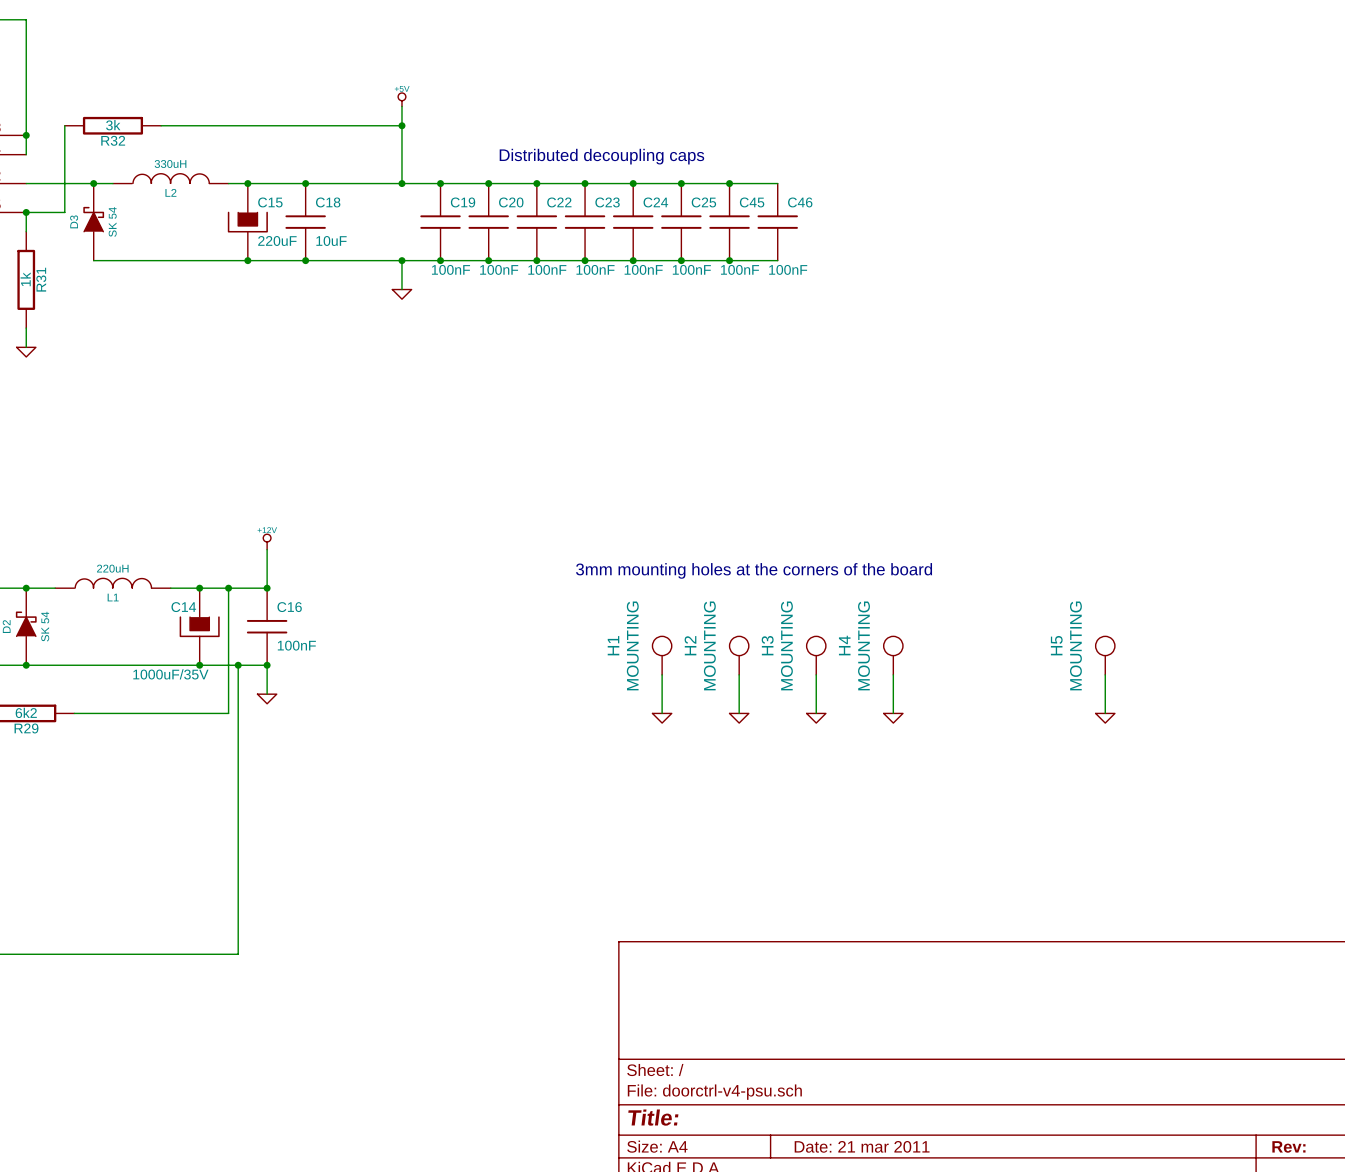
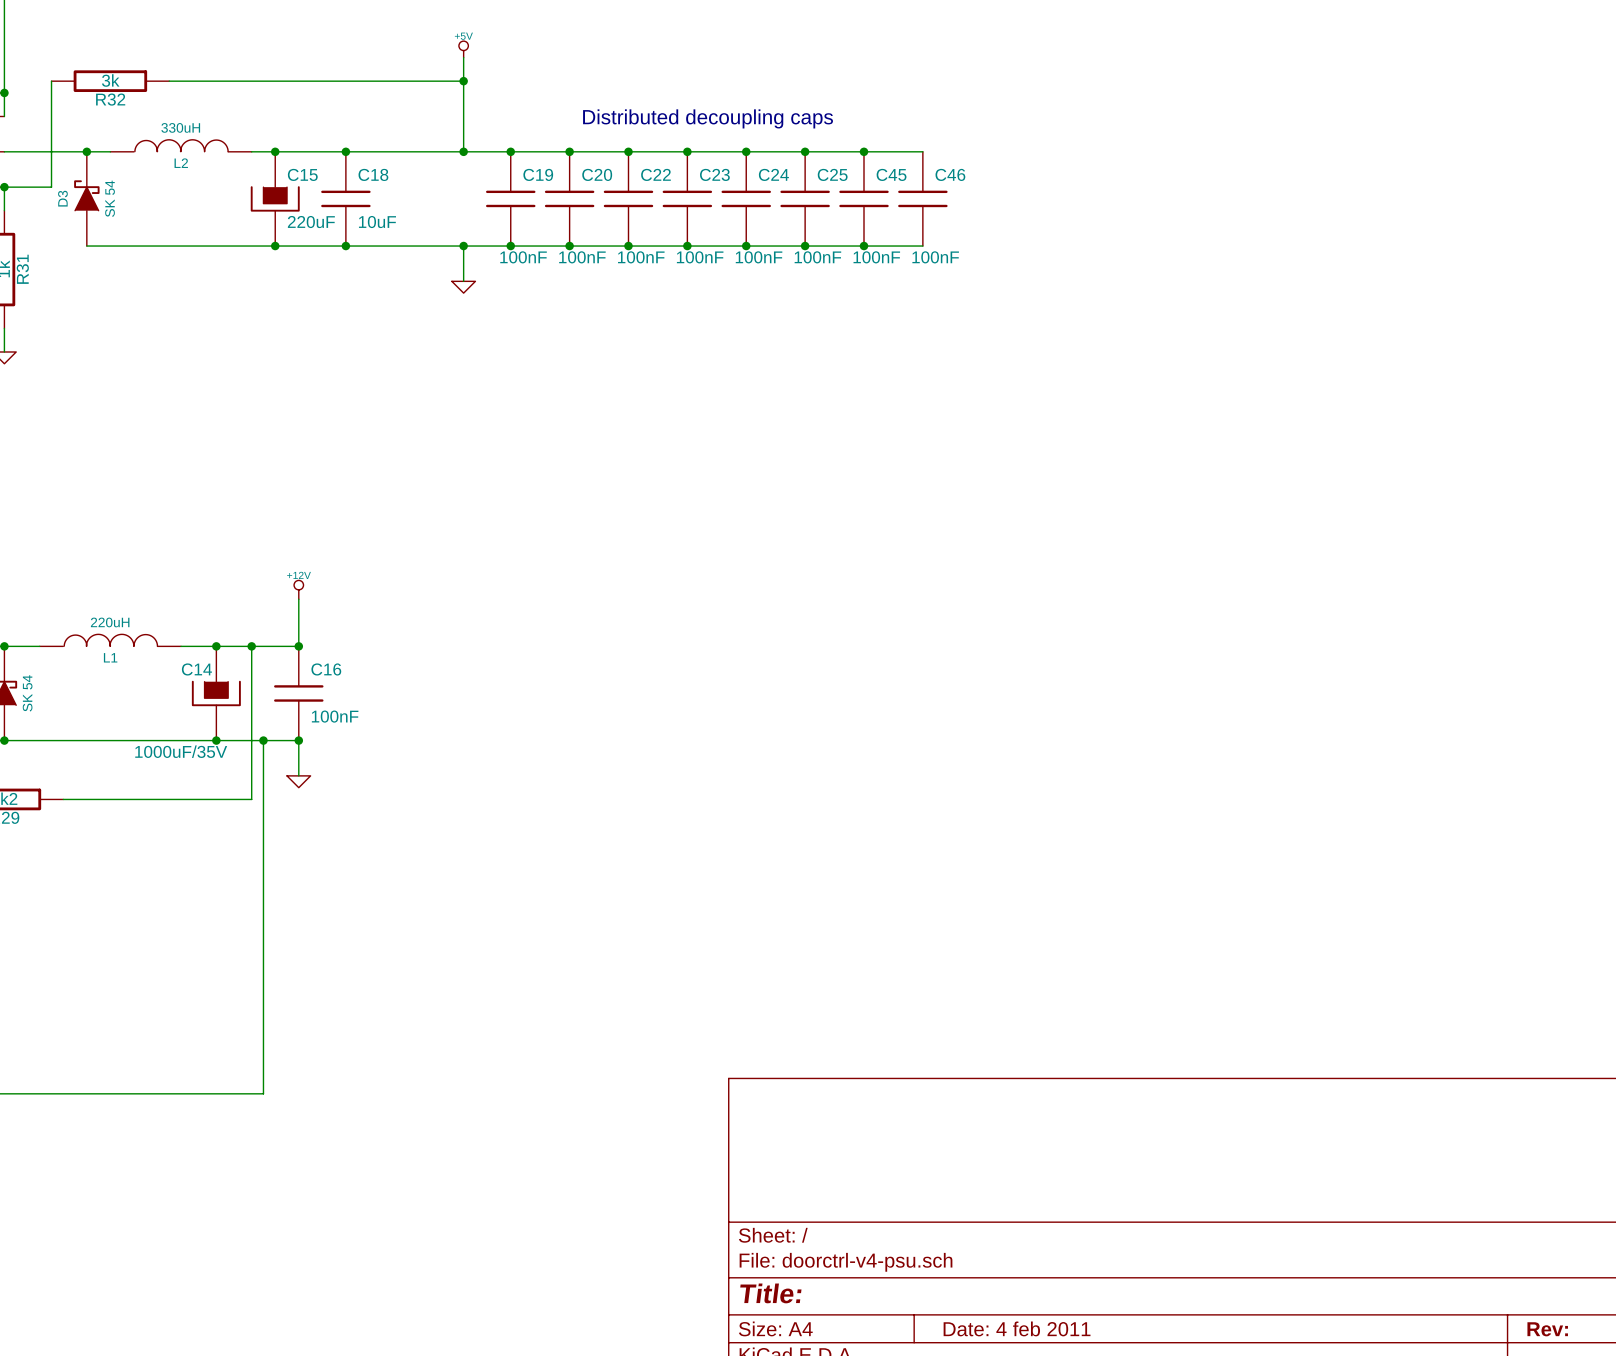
text: 3mm mounting holes at the corners of the board (754, 570) -> none
H1: MOUNTING (662, 655) -> none
H2: MOUNTING (739, 655) -> none
H3: MOUNTING (816, 655) -> none
H4: MOUNTING (893, 655) -> none
H5: MOUNTING (1105, 655) -> none
wire: (662, 674) (662, 713) -> none
wire: (739, 674) (739, 713) -> none
wire: (816, 674) (816, 713) -> none
wire: (893, 674) (893, 713) -> none
wire: (1105, 674) (1105, 713) -> none
power symbol: (662, 718) -> none
power symbol: (739, 718) -> none
power symbol: (816, 718) -> none
power symbol: (893, 718) -> none
power symbol: (1105, 718) -> none
title block: Date: 21 mar 2011 (862, 1146) -> Date: 4 feb 2011 (1017, 1328)

